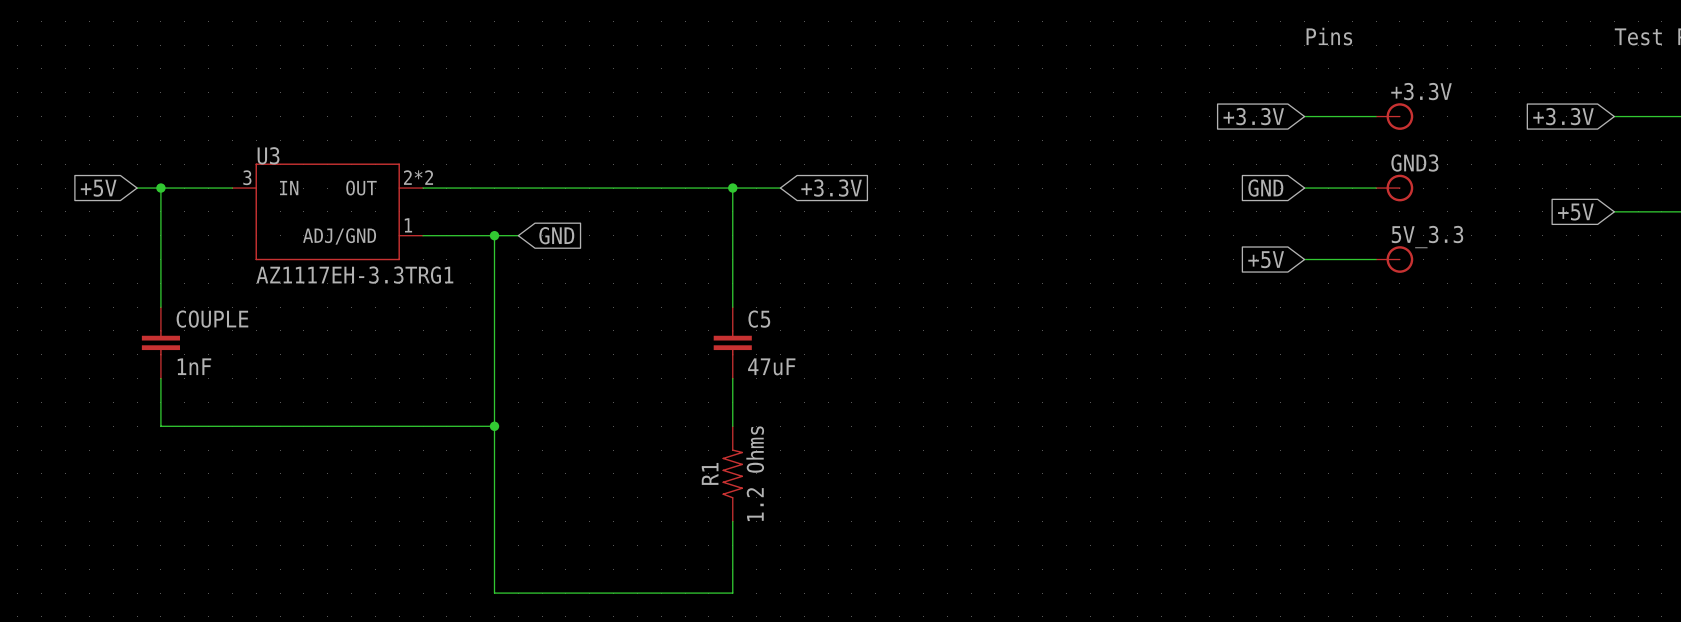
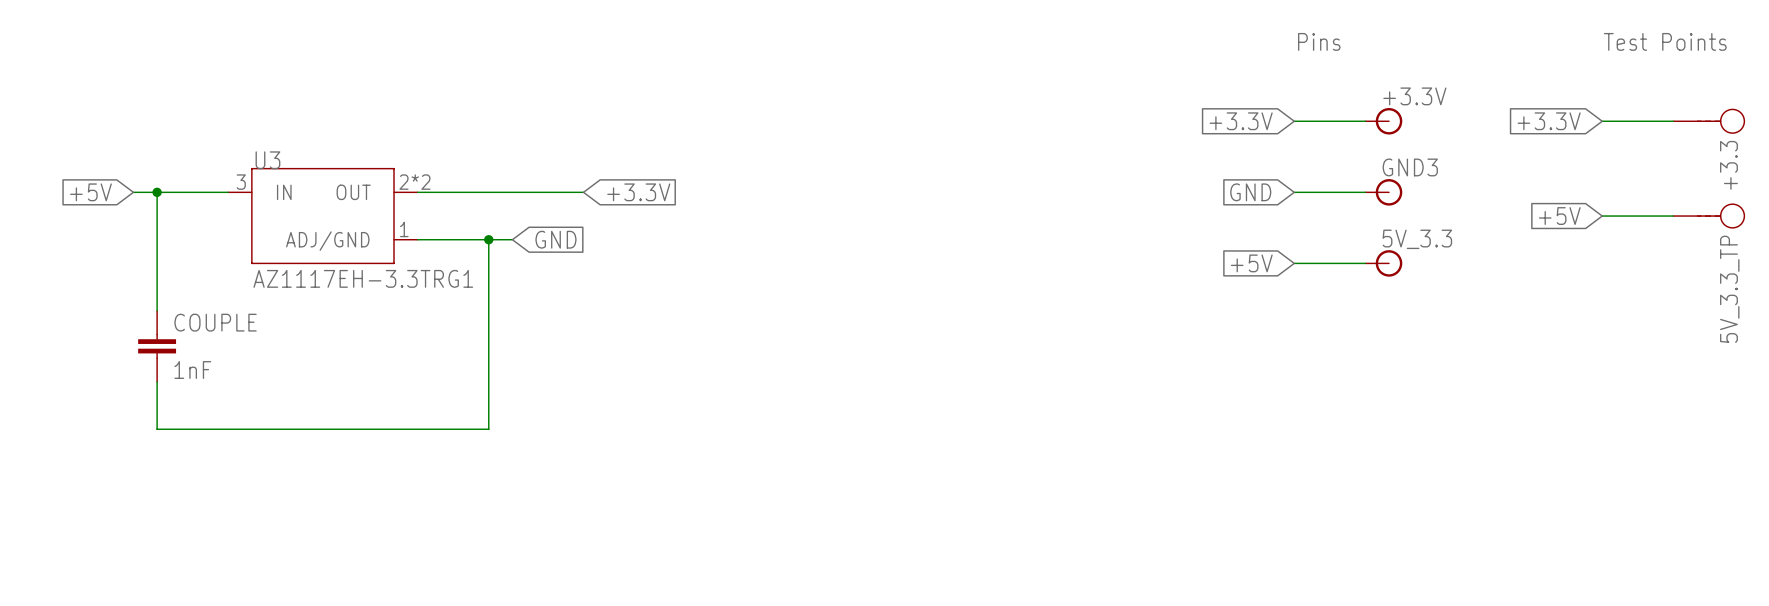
wire: (589, 188) (780, 188) -> none
wire: (732, 188) (732, 307) -> none
junction: (732, 188) -> none
global label position: +3.3V (831, 188) -> +3.3V (638, 192)
C5: 47uF (732, 342) -> none
wire: (732, 378) (732, 426) -> none
wire: (494, 426) (494, 593) (732, 593) (732, 521) -> none
junction: (494, 426) -> none
R1: 1.2 Ohms (732, 473) -> none

